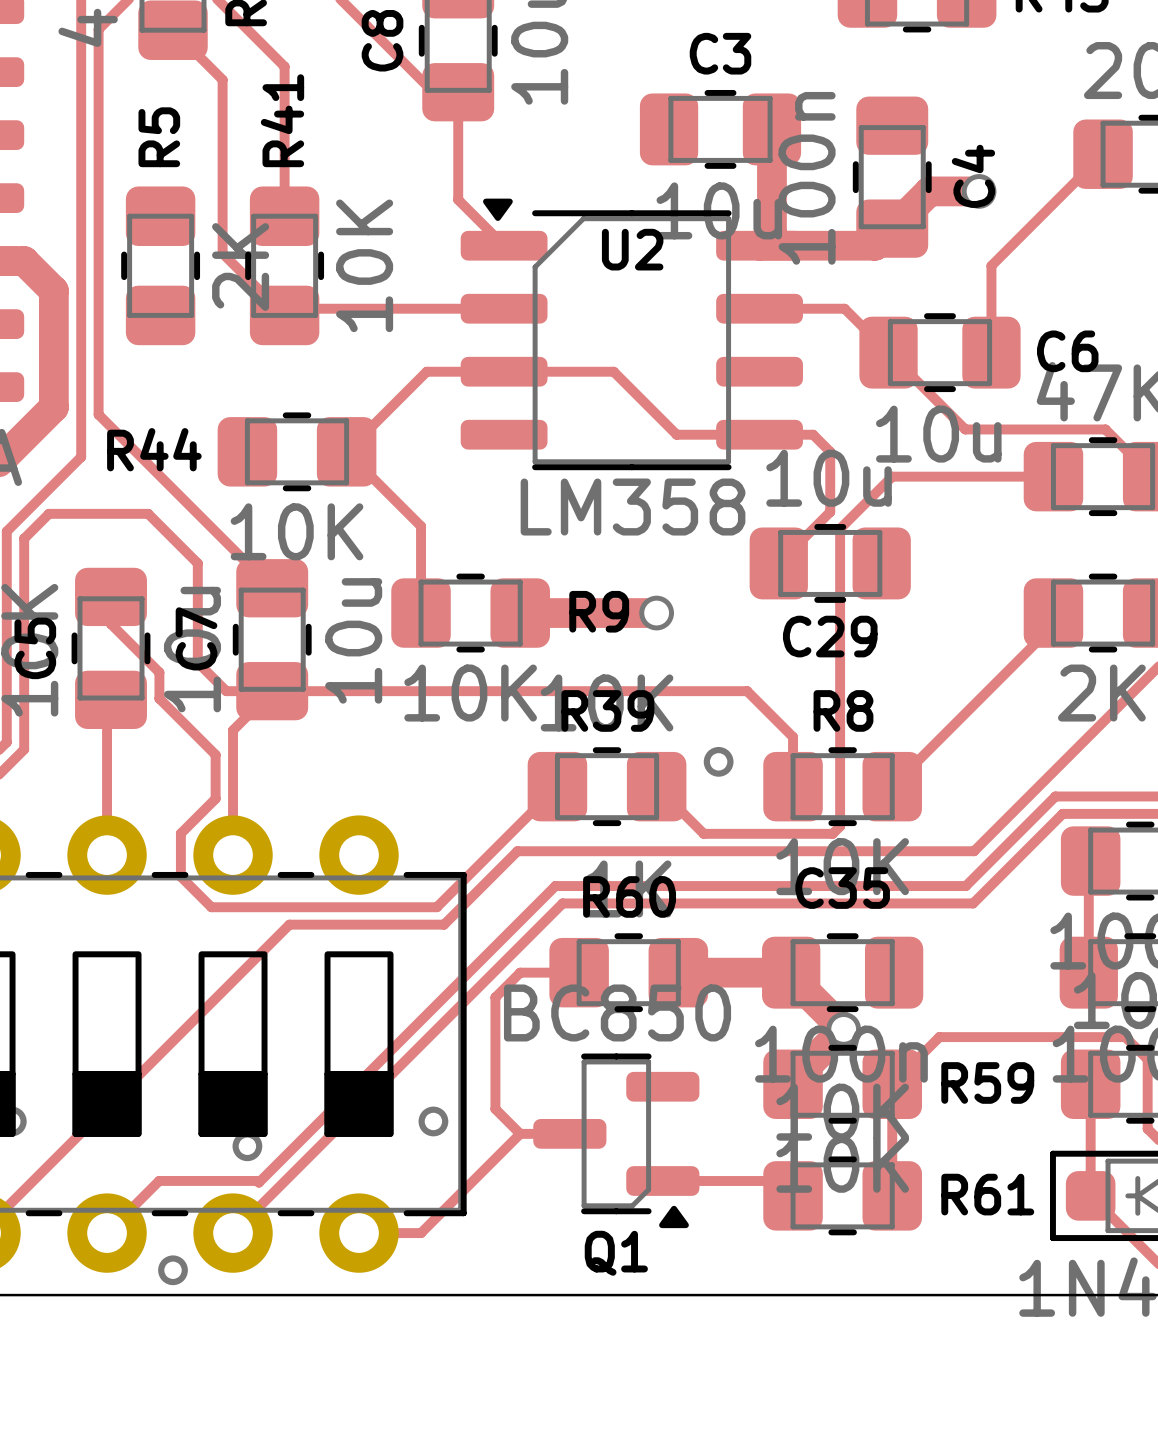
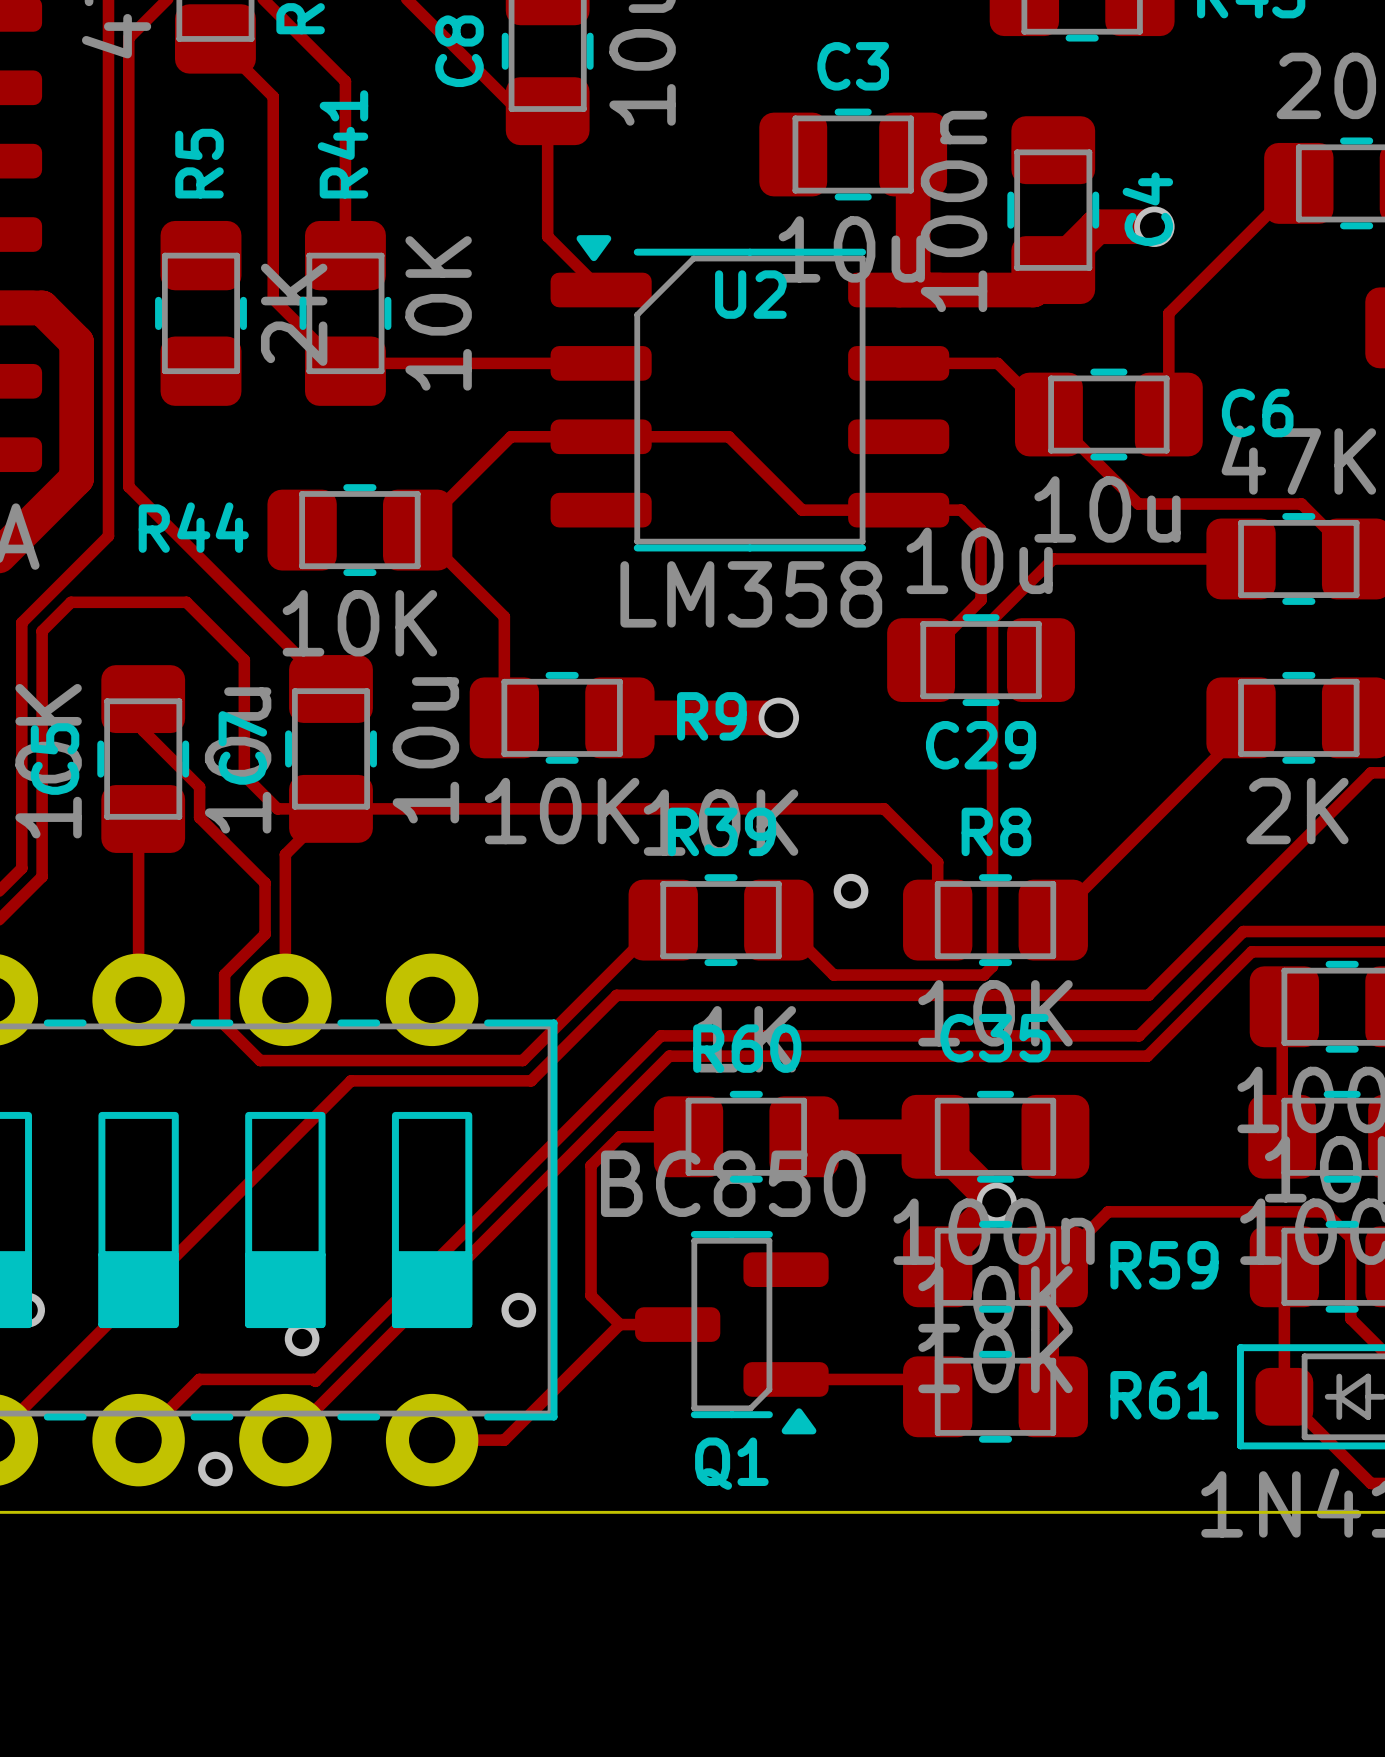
via position: (173, 1270) -> (215, 1469)

